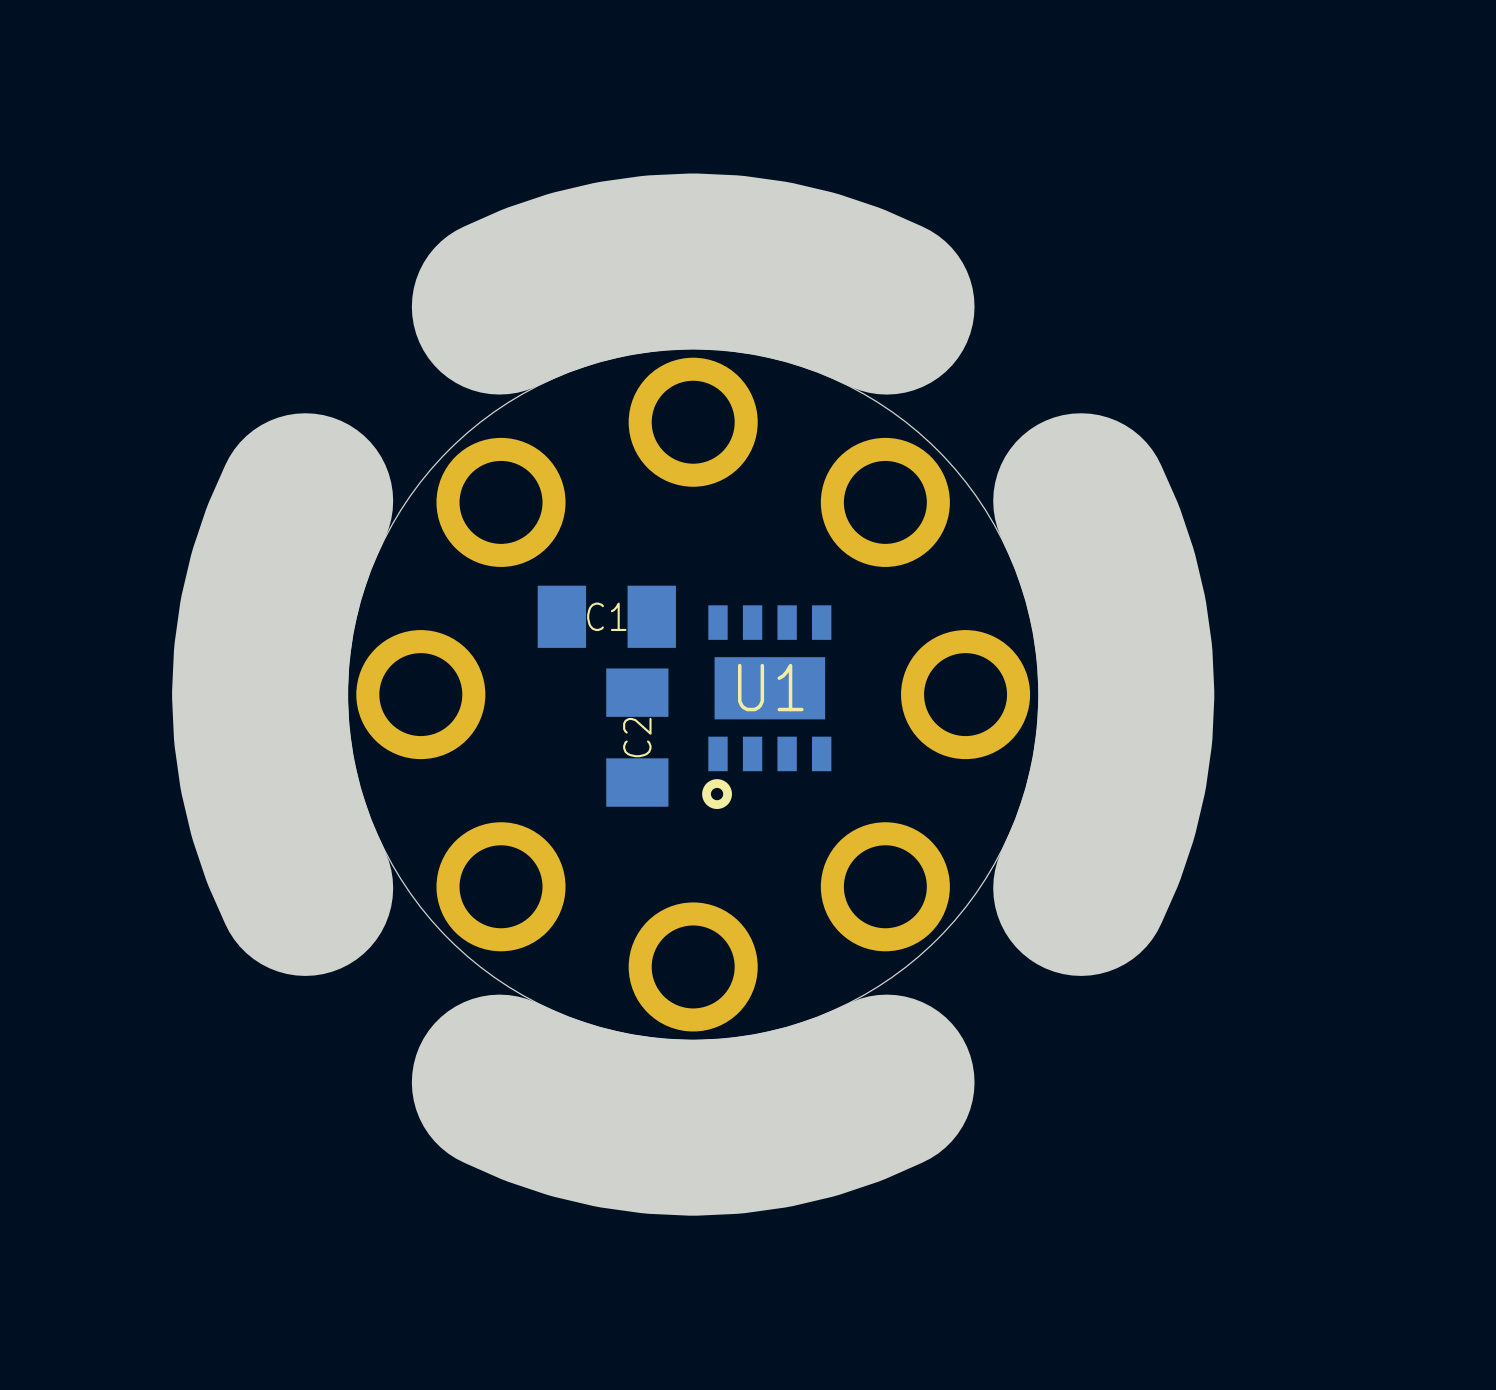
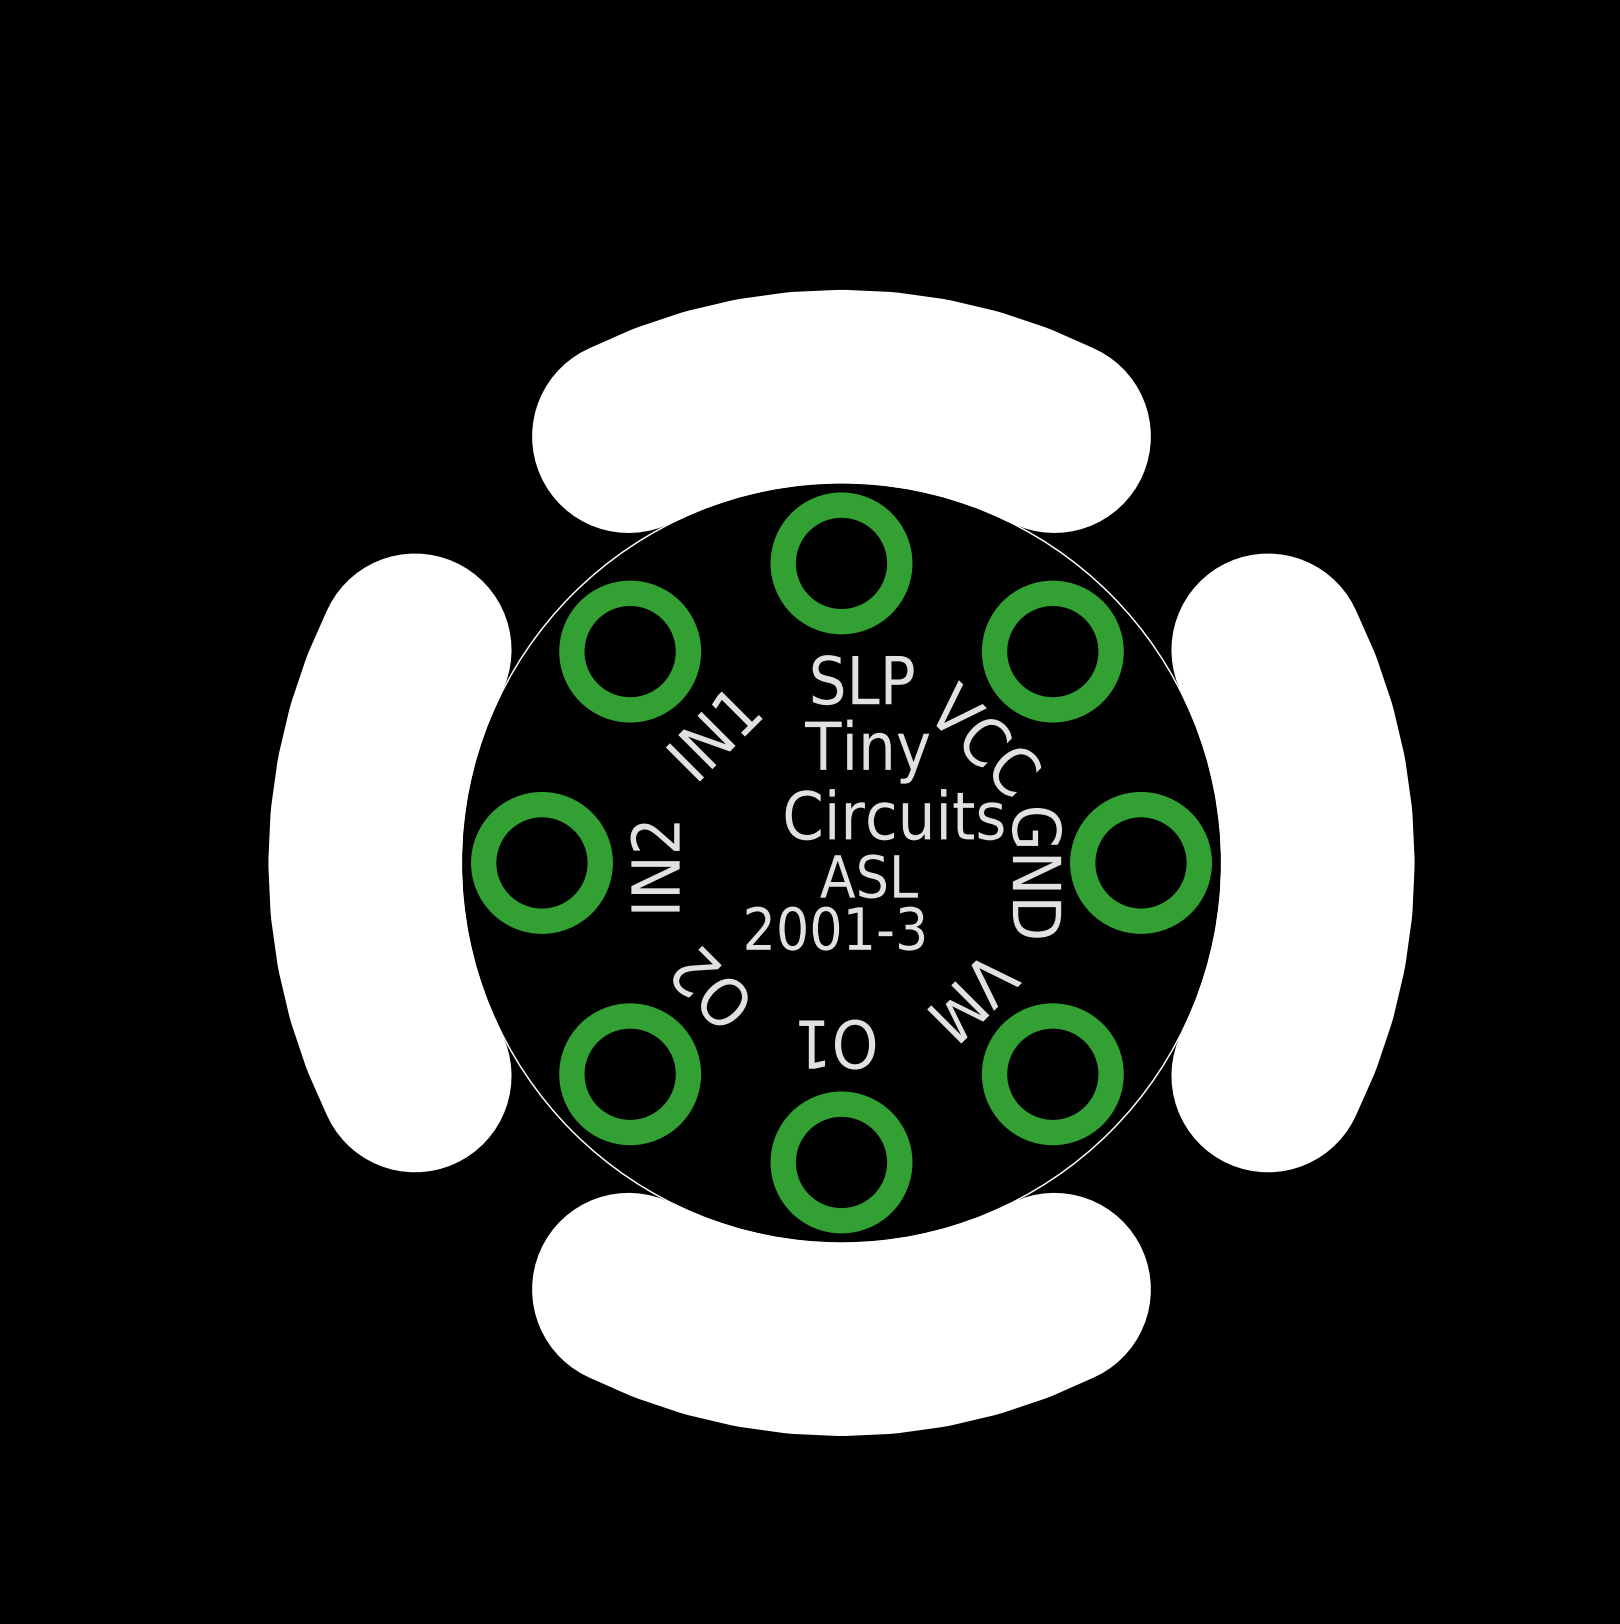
text: none -> SLP (863, 680)
text: none -> IN1 (714, 736)
text: none -> VCC (988, 738)
text: none -> Tiny (867, 751)
C1: (606, 616) -> none
text: none -> Circuits (894, 814)
text: none -> IN2 (655, 867)
text: none -> GND (1037, 872)
text: none -> ASL (869, 876)
U1: (766, 707) -> none
C2: (637, 737) -> none
text: none -> 2001-3 (835, 928)
text: none -> O2 (710, 986)
text: none -> VM (974, 1001)
text: none -> O1 (837, 1044)

